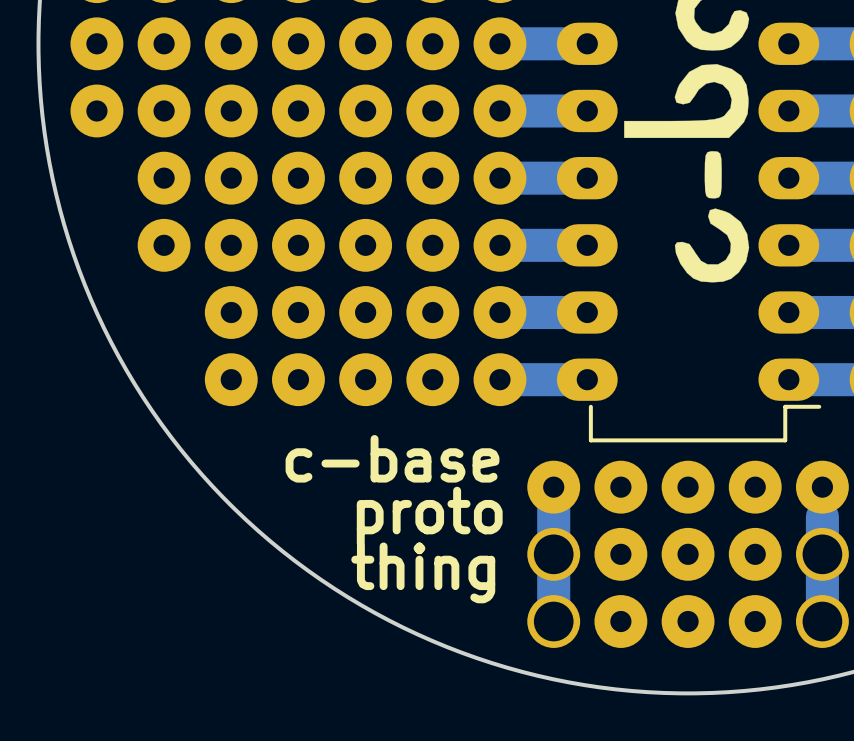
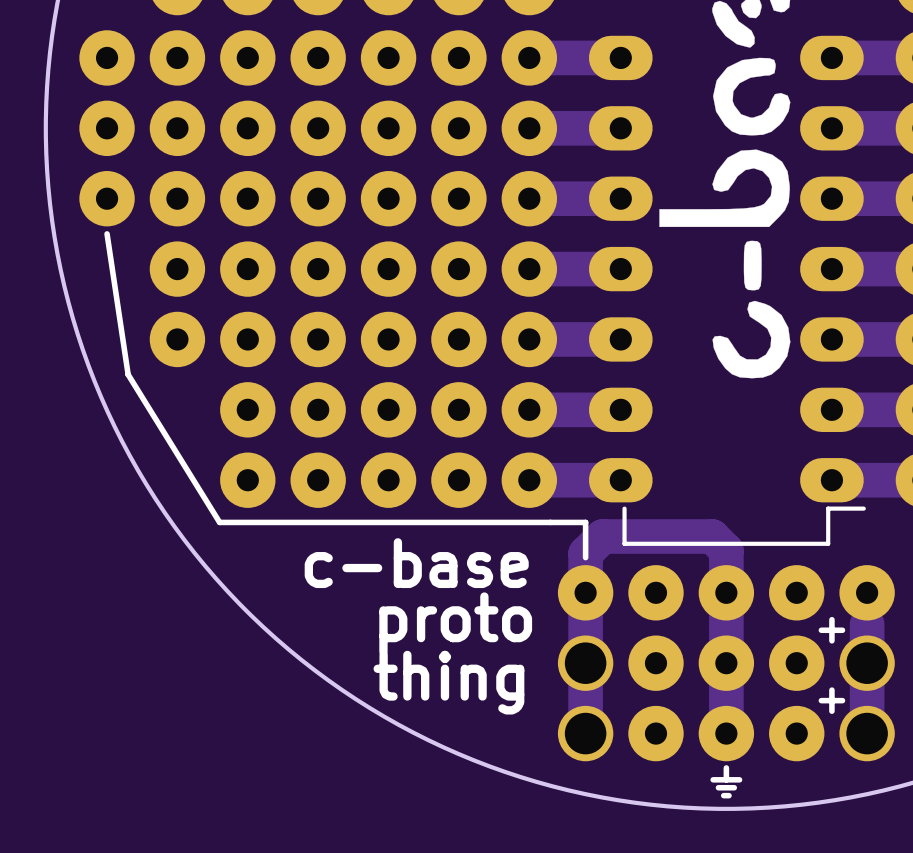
line: none -> (107, 233) (128, 374) (219, 522) (585, 522) (585, 557)
track: none -> (585, 592) (585, 553) (602, 536) (712, 536) (726, 550) (726, 733)
text: none -> + (831, 630)
text: none -> + (831, 700)
text: none -> ⏚ (726, 781)

